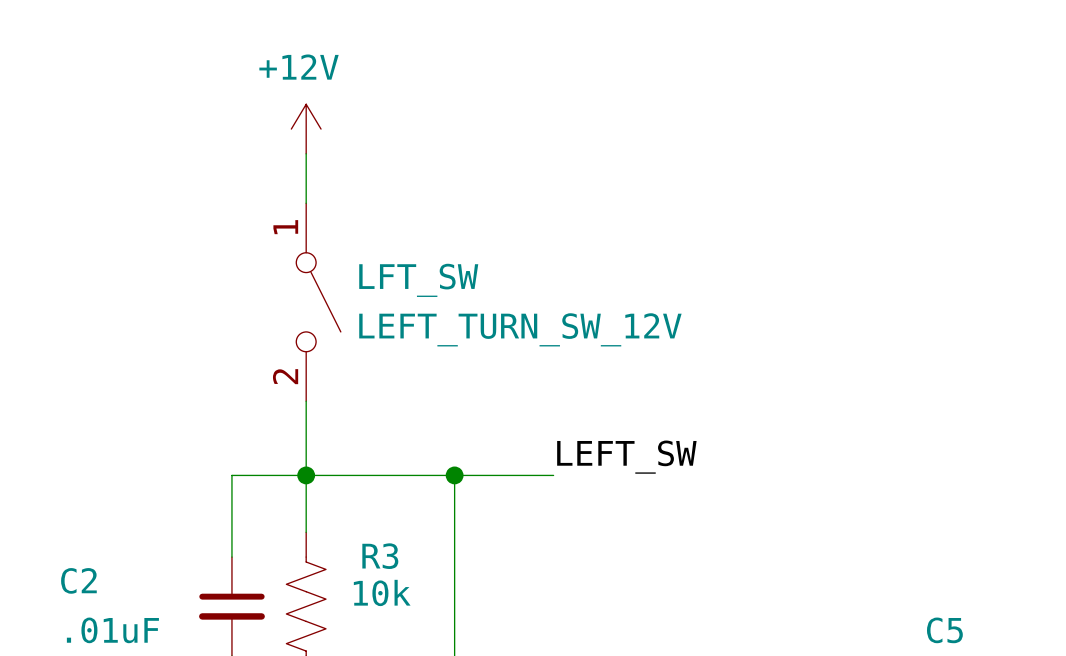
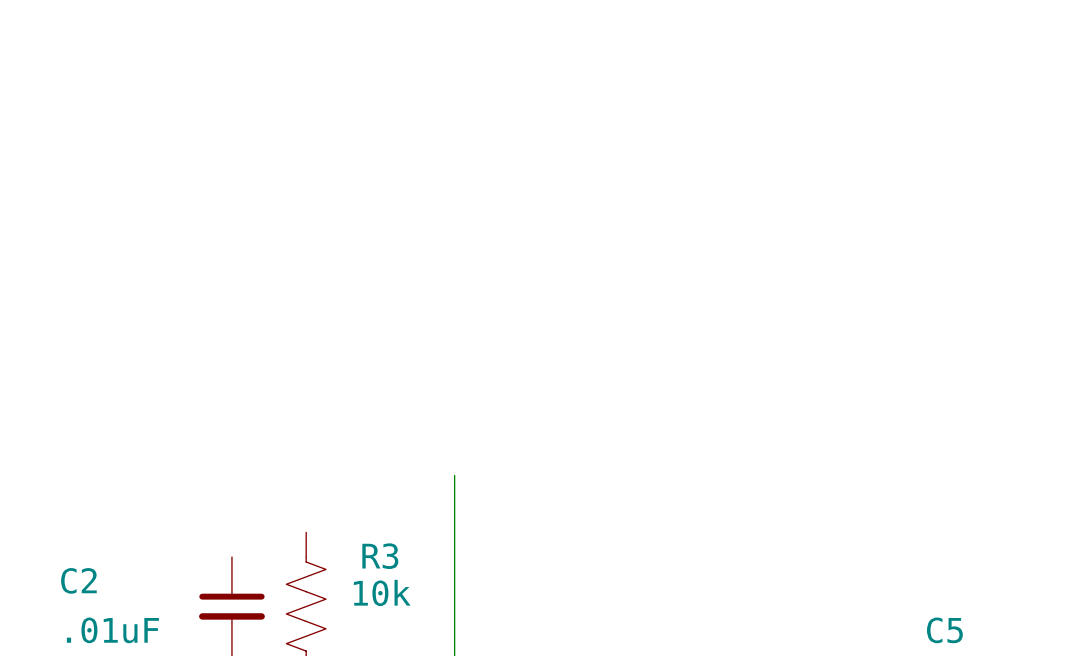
power symbol: +12V (306, 129) -> none
wire: (306, 153) (306, 203) -> none
LFT_SW: LEFT_TURN_SW_12V (318, 302) -> none
wire: (306, 401) (306, 532) -> none
label: LEFT_SW (626, 457) -> none
junction: (306, 475) -> none
junction: (454, 475) -> none
wire: (553, 475) (231, 475) (231, 557) -> none

